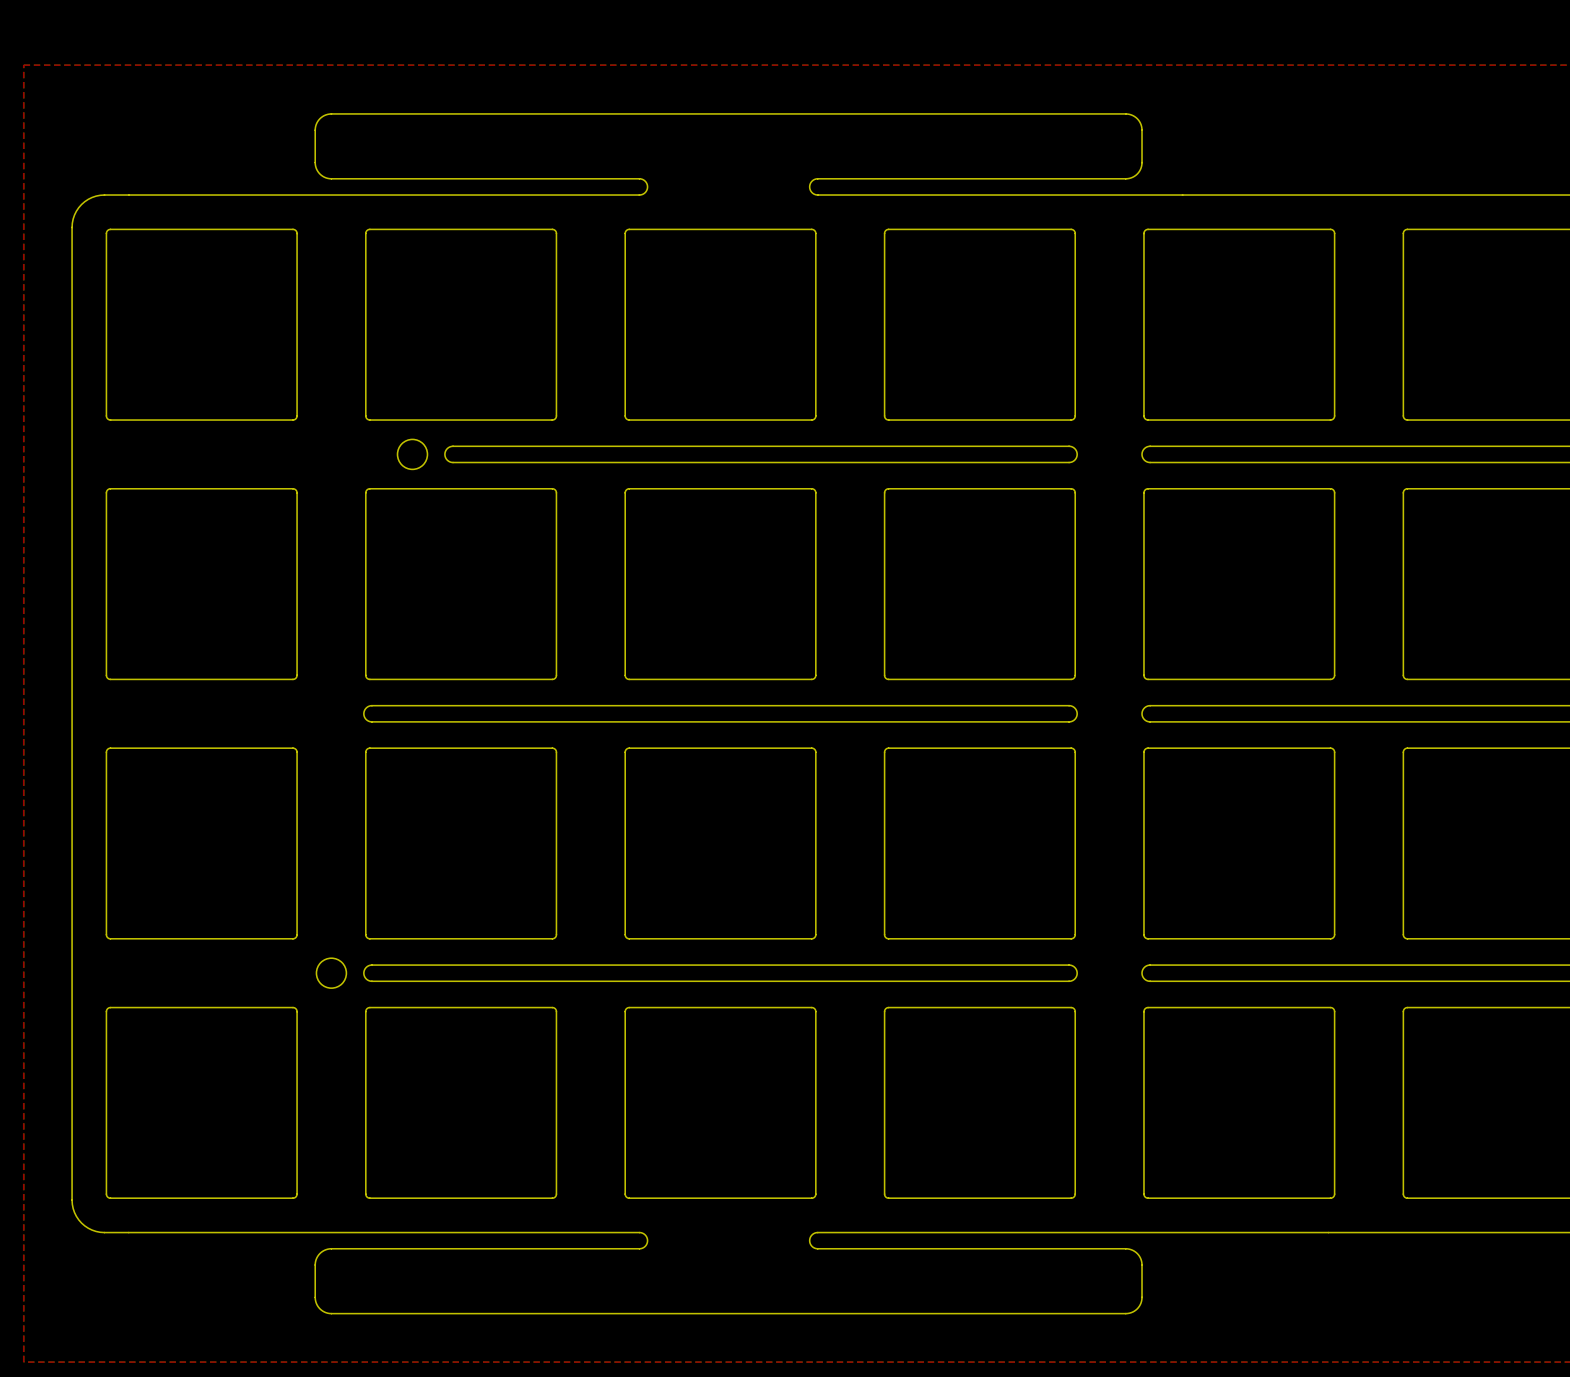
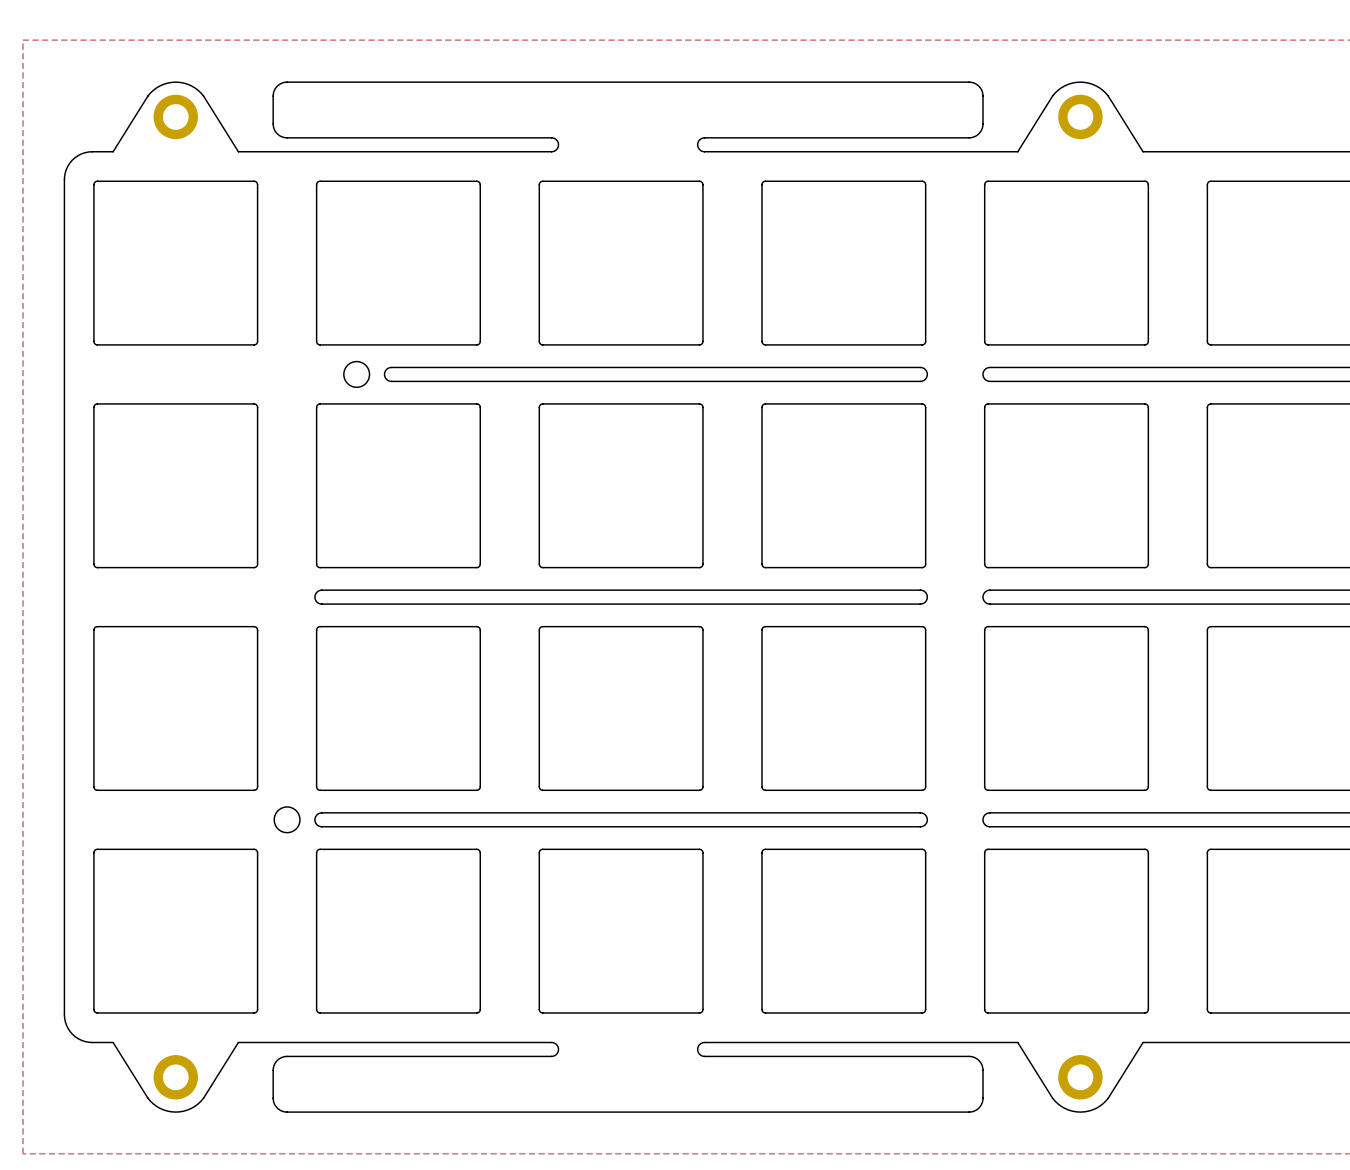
part: none -> (175, 116)
part: none -> (1080, 116)
board edge: (128, 195) (274, 195) -> (113, 151) (150, 92) (160, 85) (175, 82) (187, 84) (200, 92) (238, 151)
board edge: (1182, 195) (1328, 195) -> (1017, 151) (1055, 92) (1064, 85) (1080, 82) (1092, 84) (1105, 92) (1143, 151)
board edge: (128, 1232) (274, 1232) -> (113, 1042) (150, 1101) (160, 1108) (175, 1112) (187, 1110) (200, 1101) (238, 1042)
board edge: (1182, 1232) (1328, 1232) -> (1017, 1042) (1055, 1101) (1064, 1108) (1080, 1112) (1092, 1110) (1105, 1101) (1143, 1042)
part: none -> (175, 1077)
part: none -> (1080, 1077)

